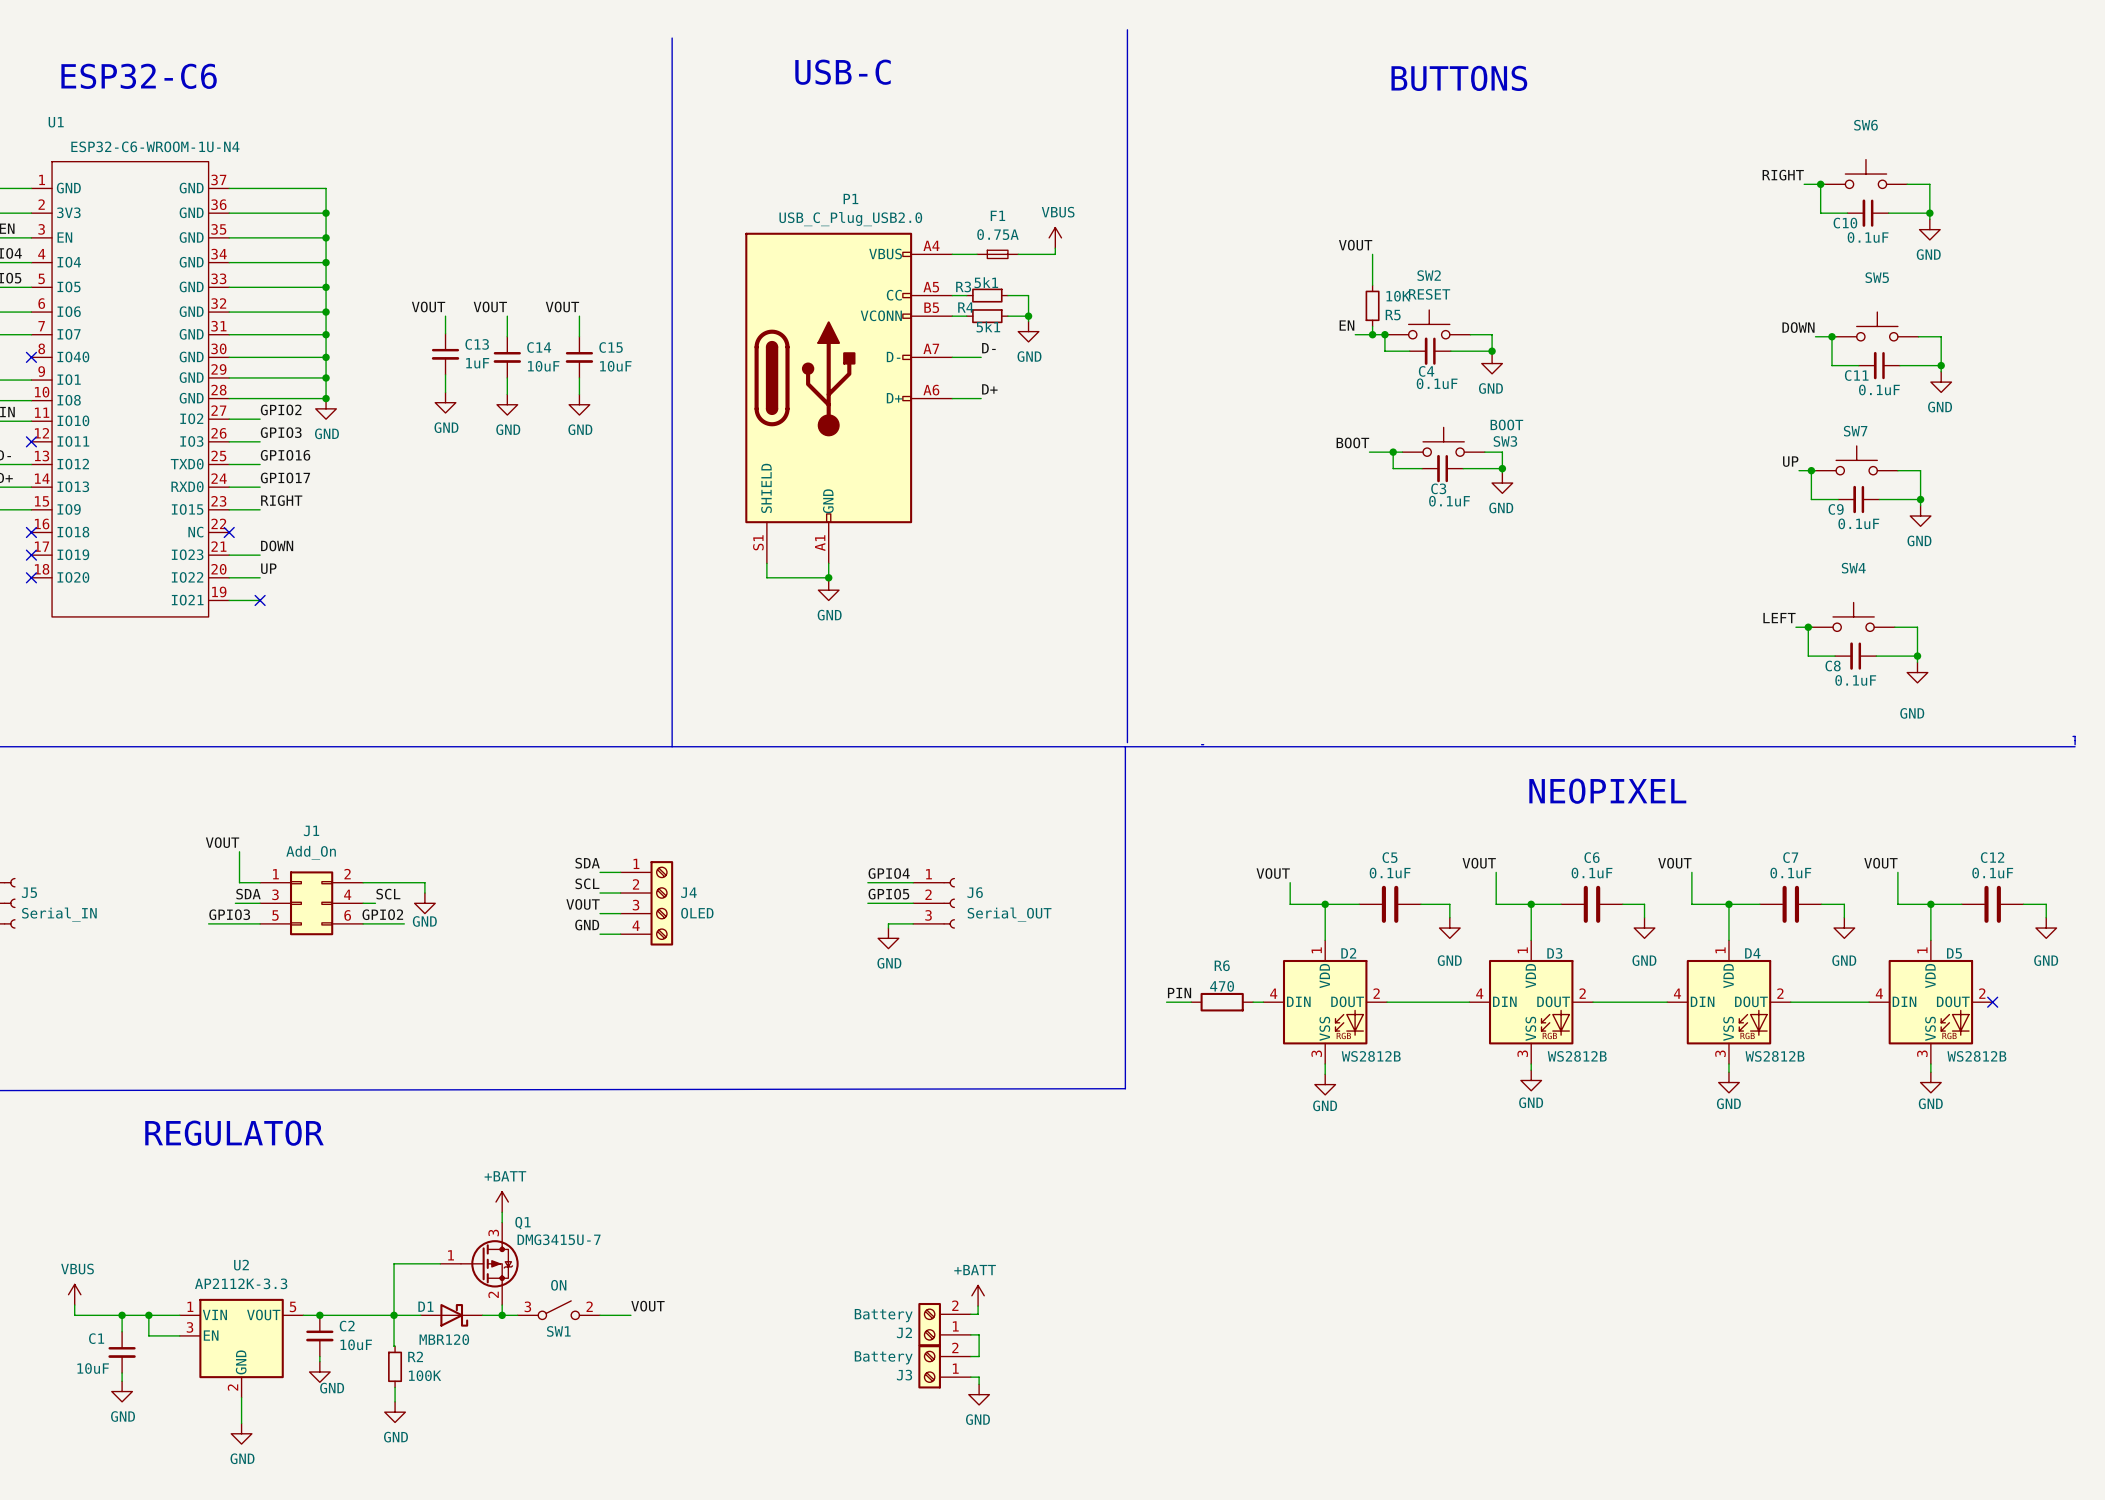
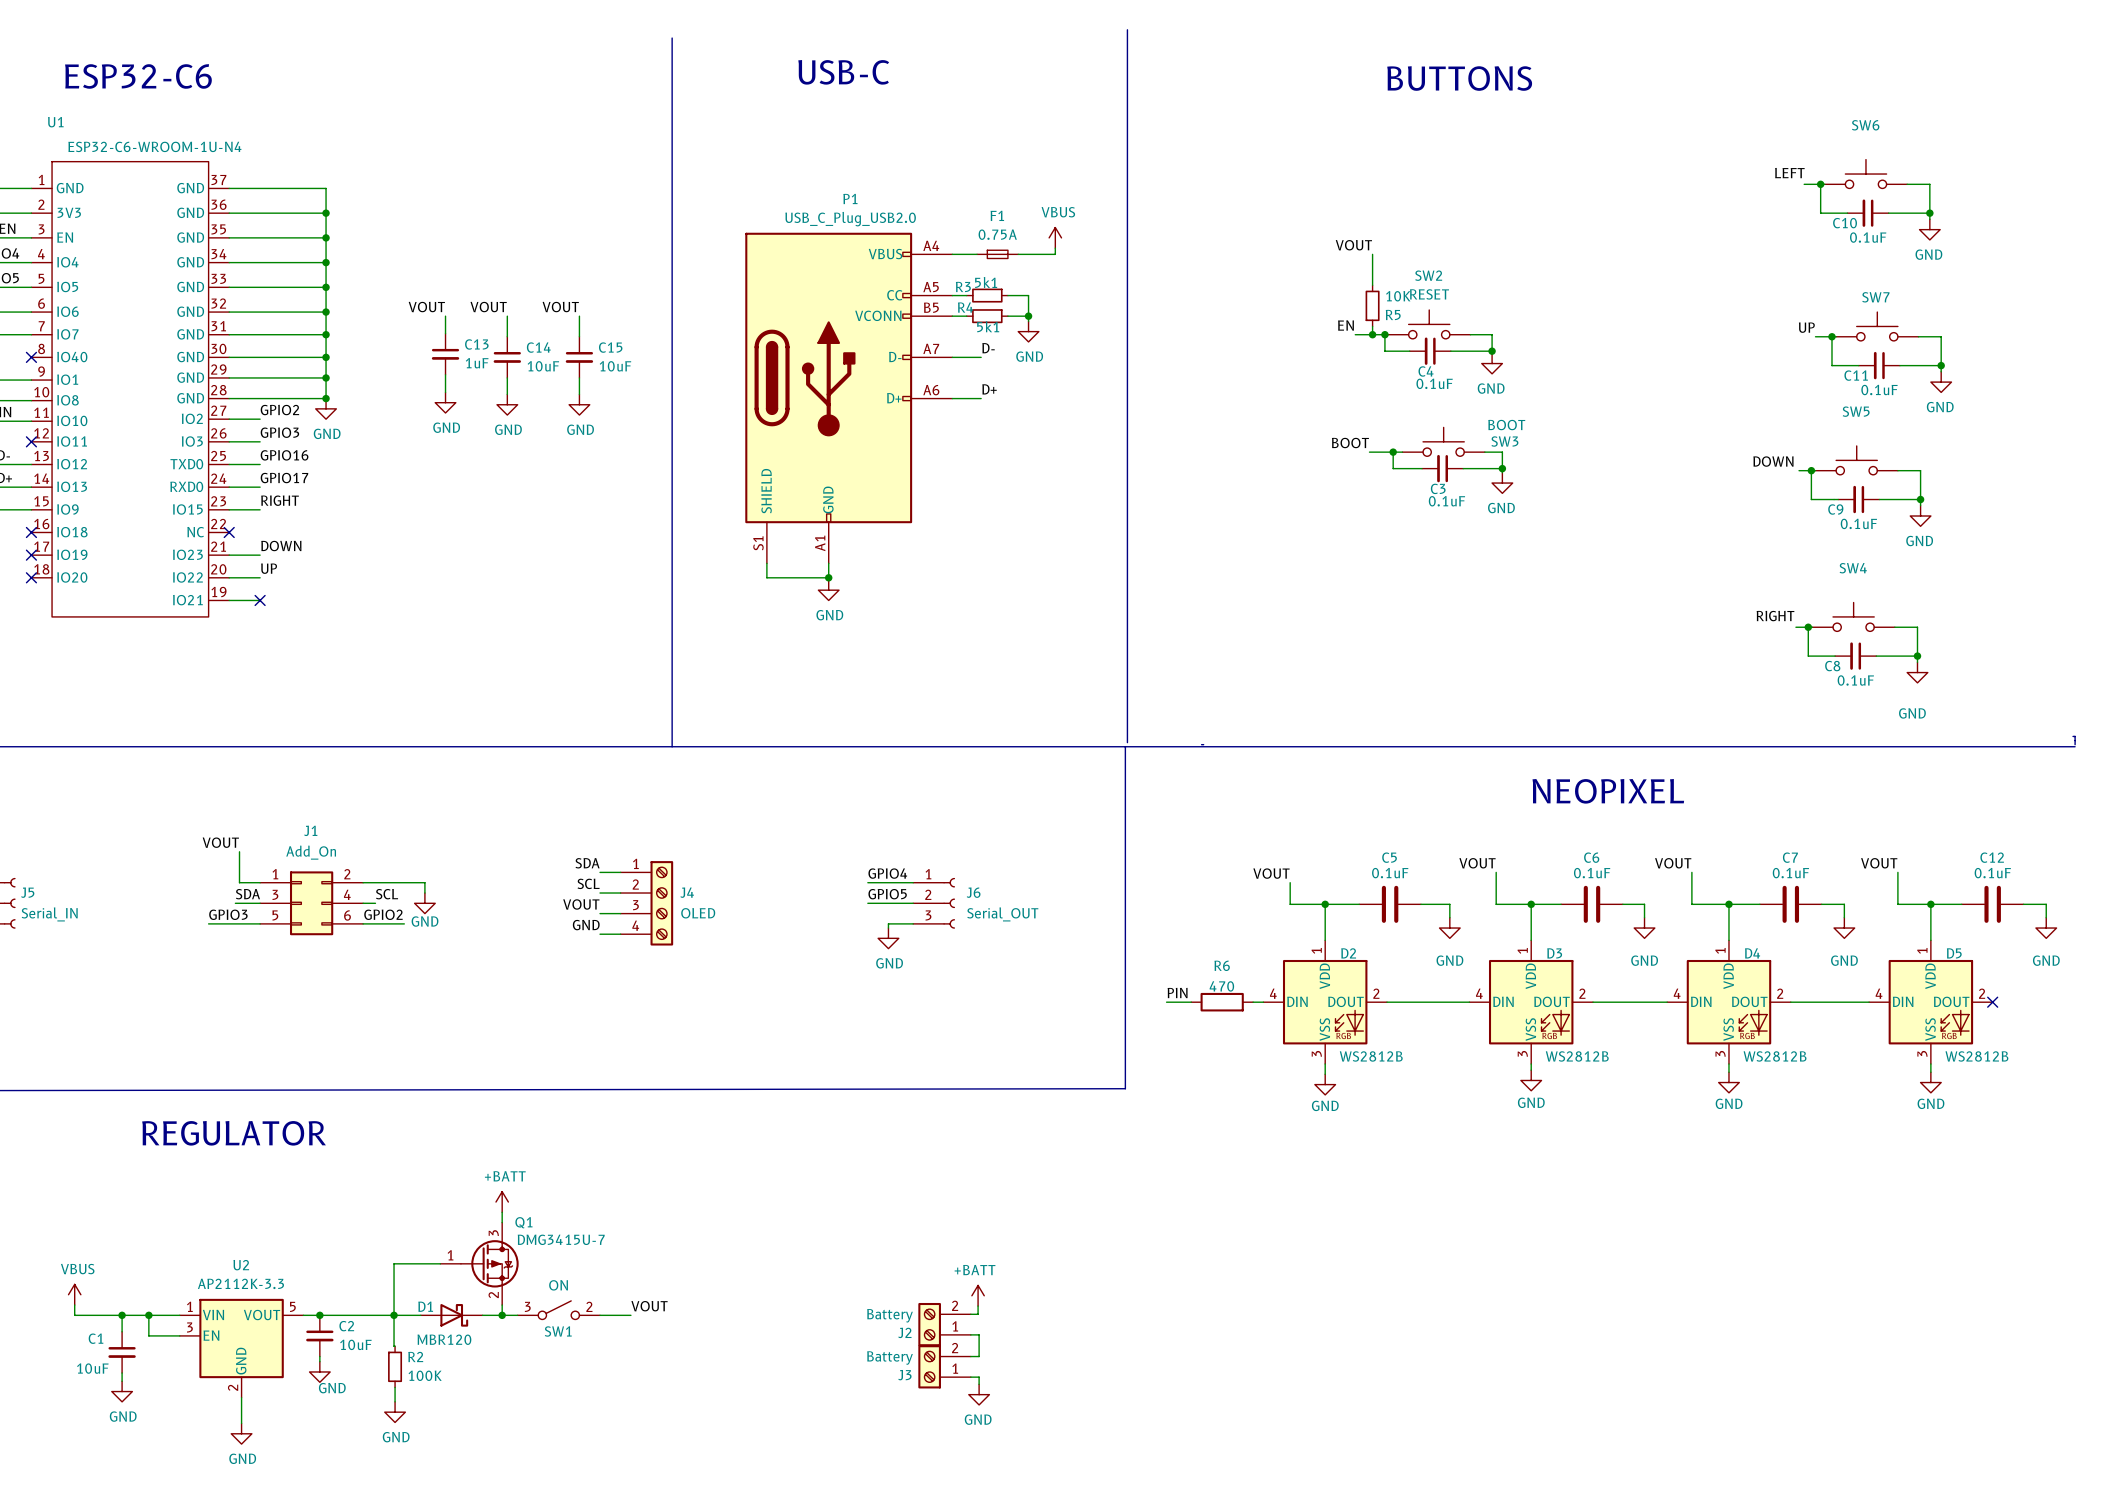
label: RIGHT (1783, 175) -> LEFT (1789, 173)
SW5 name: SW5 (1877, 277) -> SW7 (1875, 297)
label: DOWN (1798, 327) -> UP (1806, 327)
SW7 name: SW7 (1855, 431) -> SW5 (1856, 411)
label: UP (1790, 461) -> DOWN (1773, 461)
label: LEFT (1779, 618) -> RIGHT (1775, 616)

